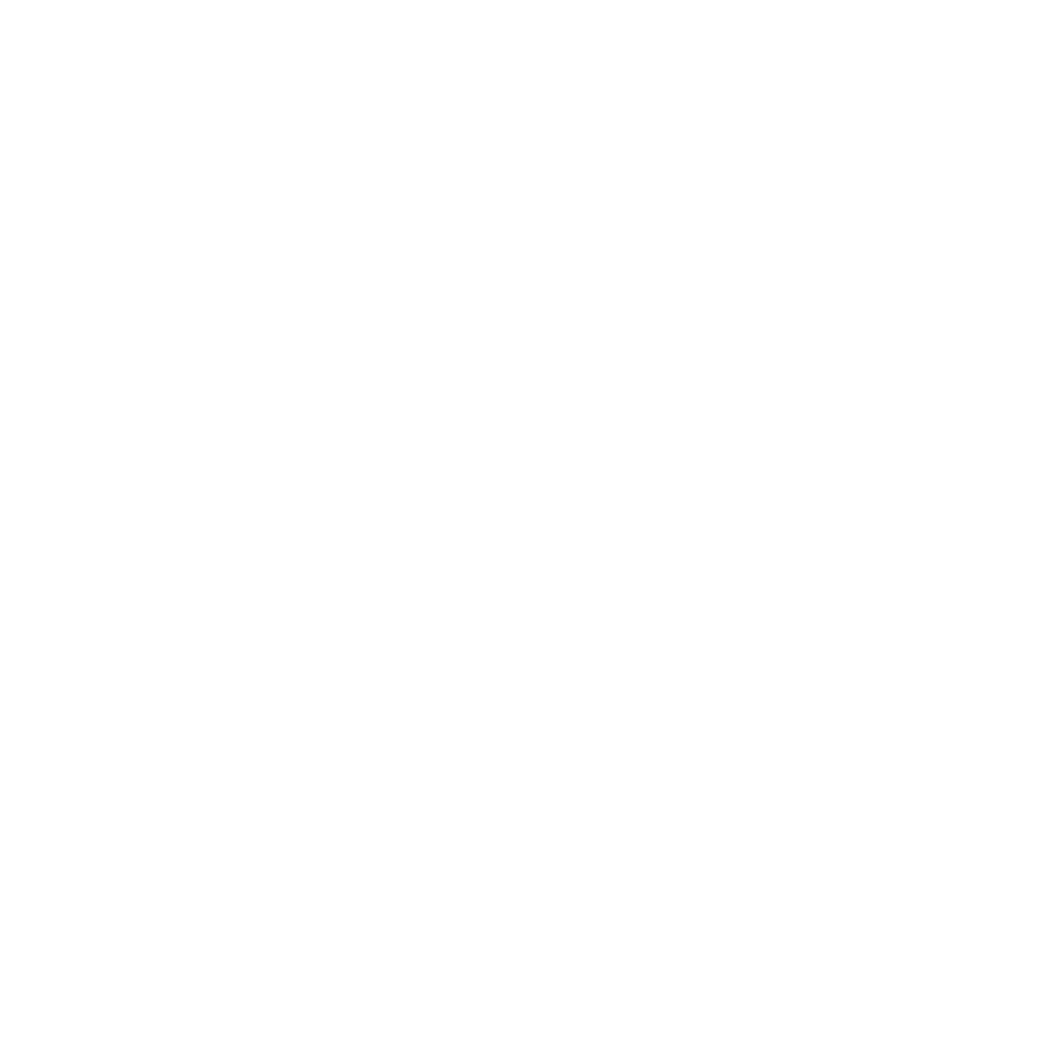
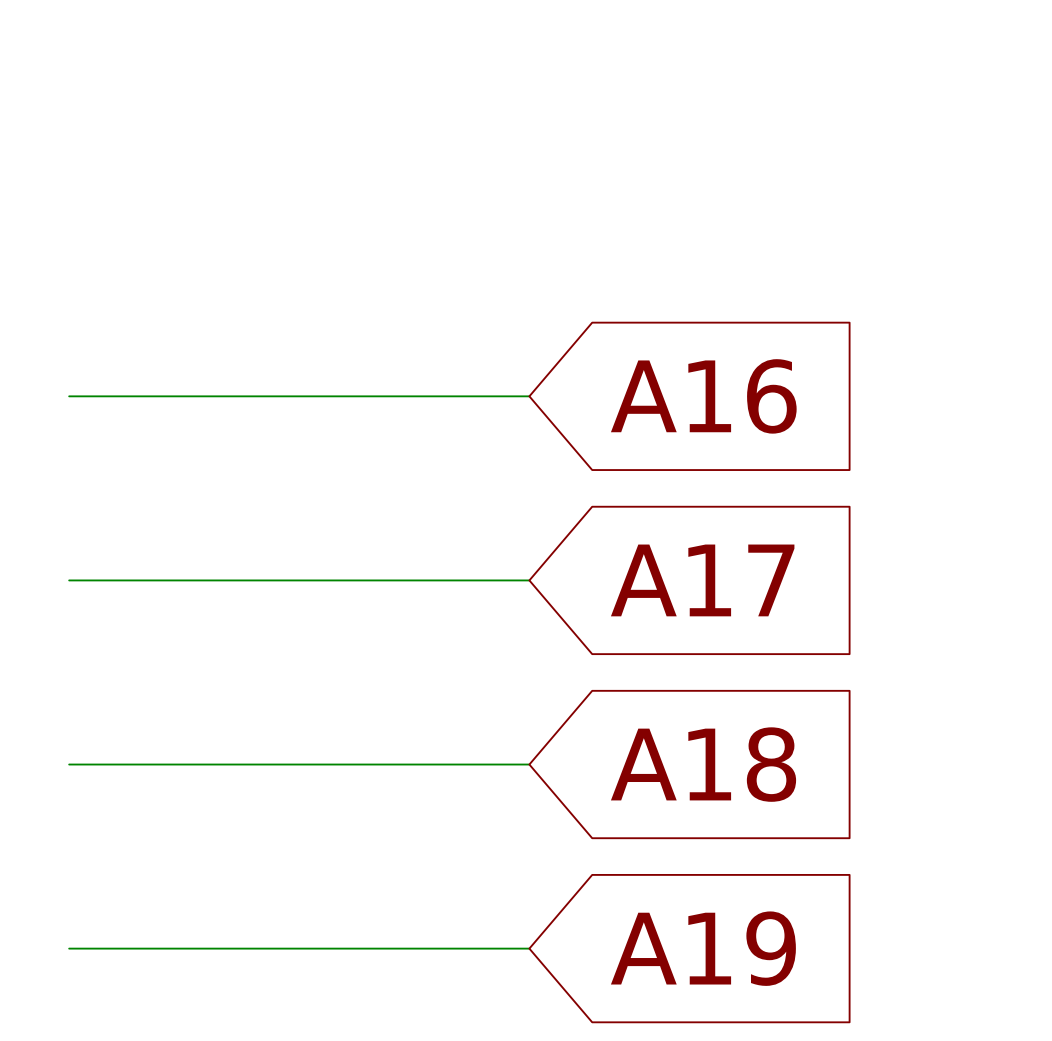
wire: none -> (69, 396) (529, 396)
global label: none -> A16 (703, 396)
wire: none -> (69, 580) (529, 580)
global label: none -> A17 (702, 580)
wire: none -> (69, 764) (529, 764)
global label: none -> A18 (703, 764)
wire: none -> (69, 948) (529, 948)
global label: none -> A19 (703, 948)

